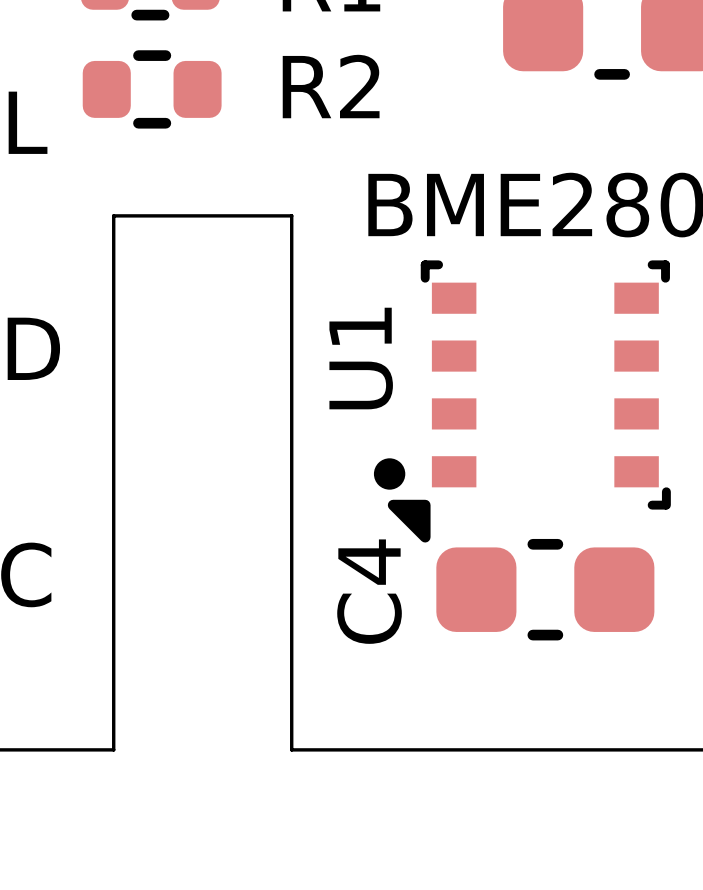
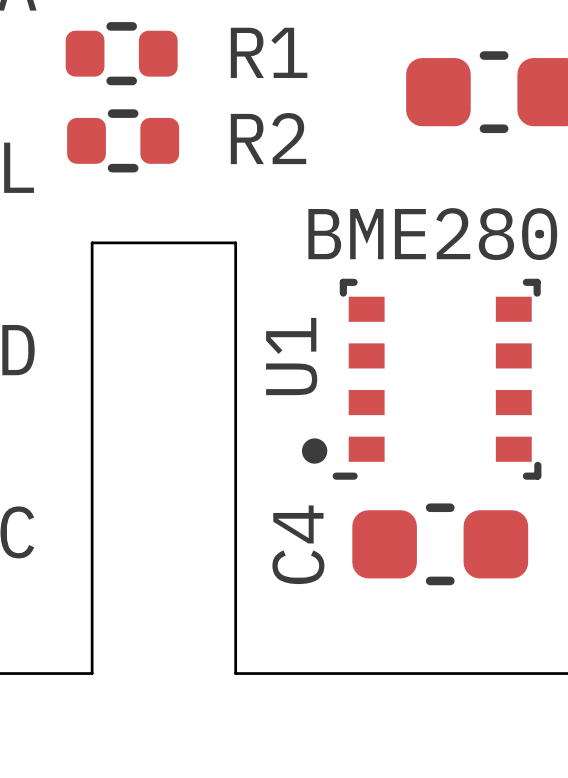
U1 footprint: [387, 260, 671, 543] -> [332, 278, 542, 480]

